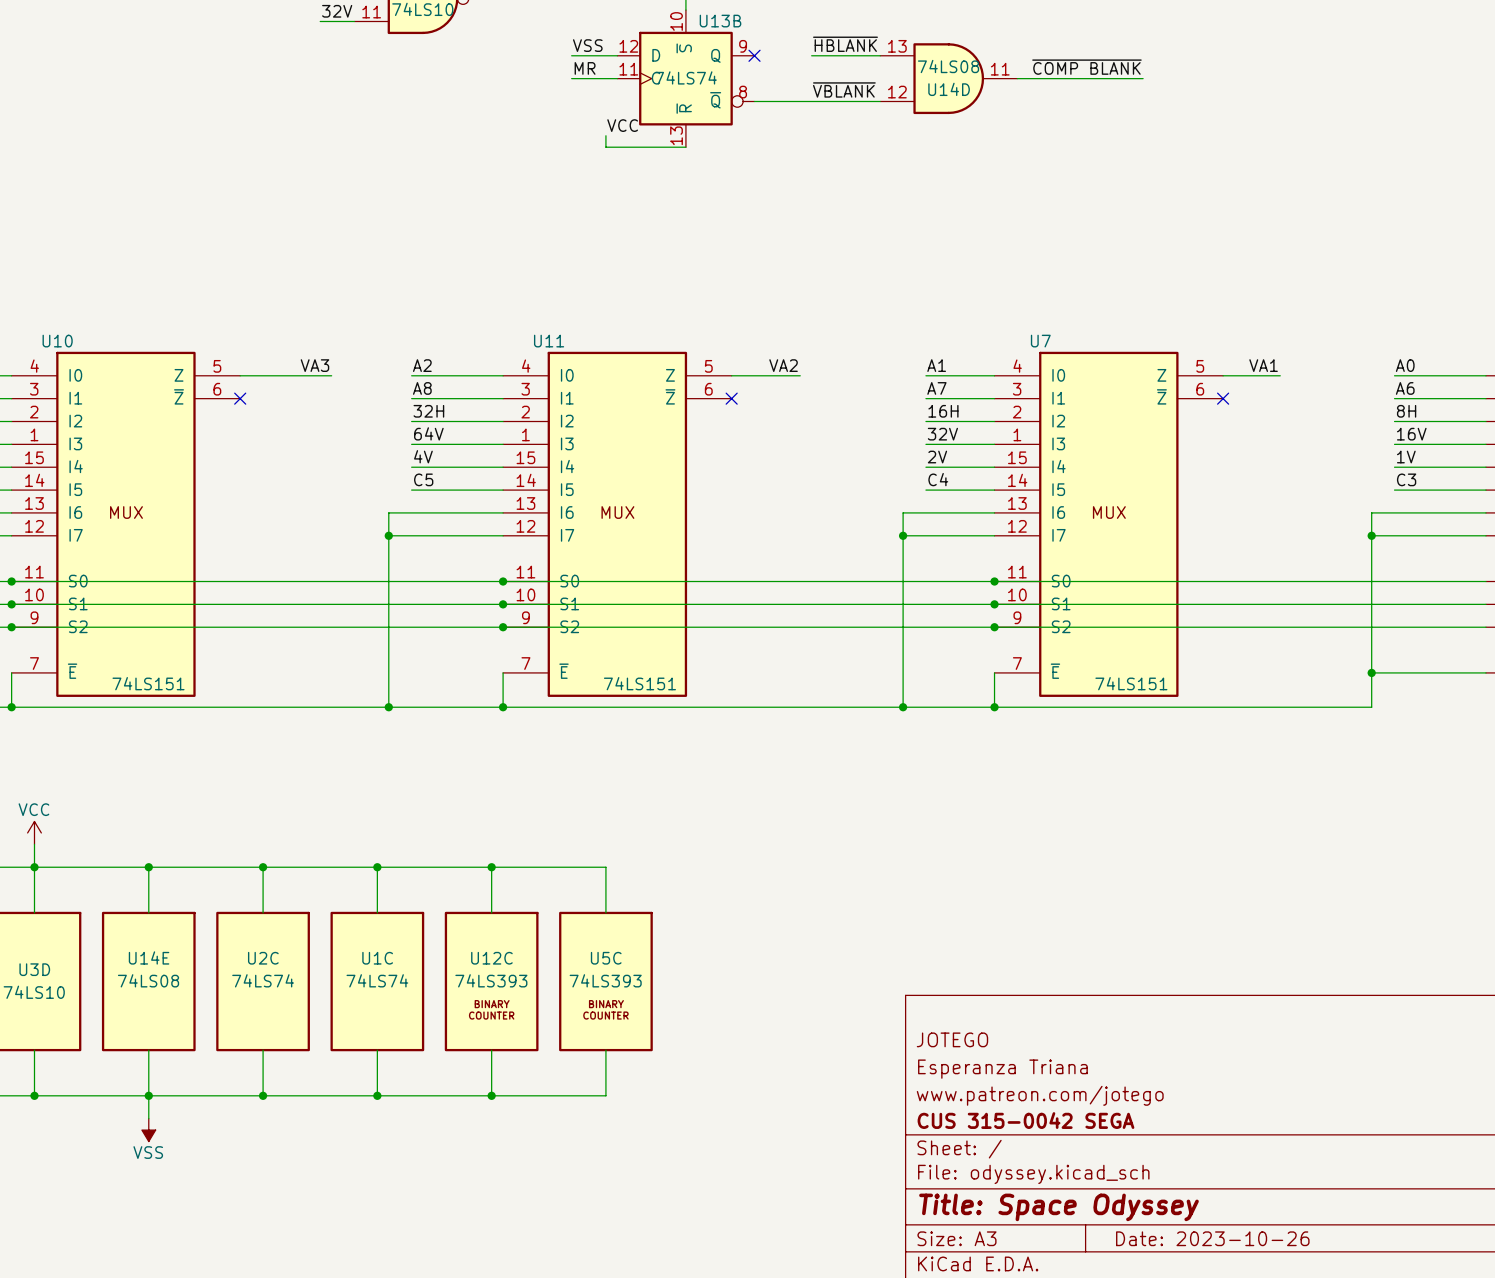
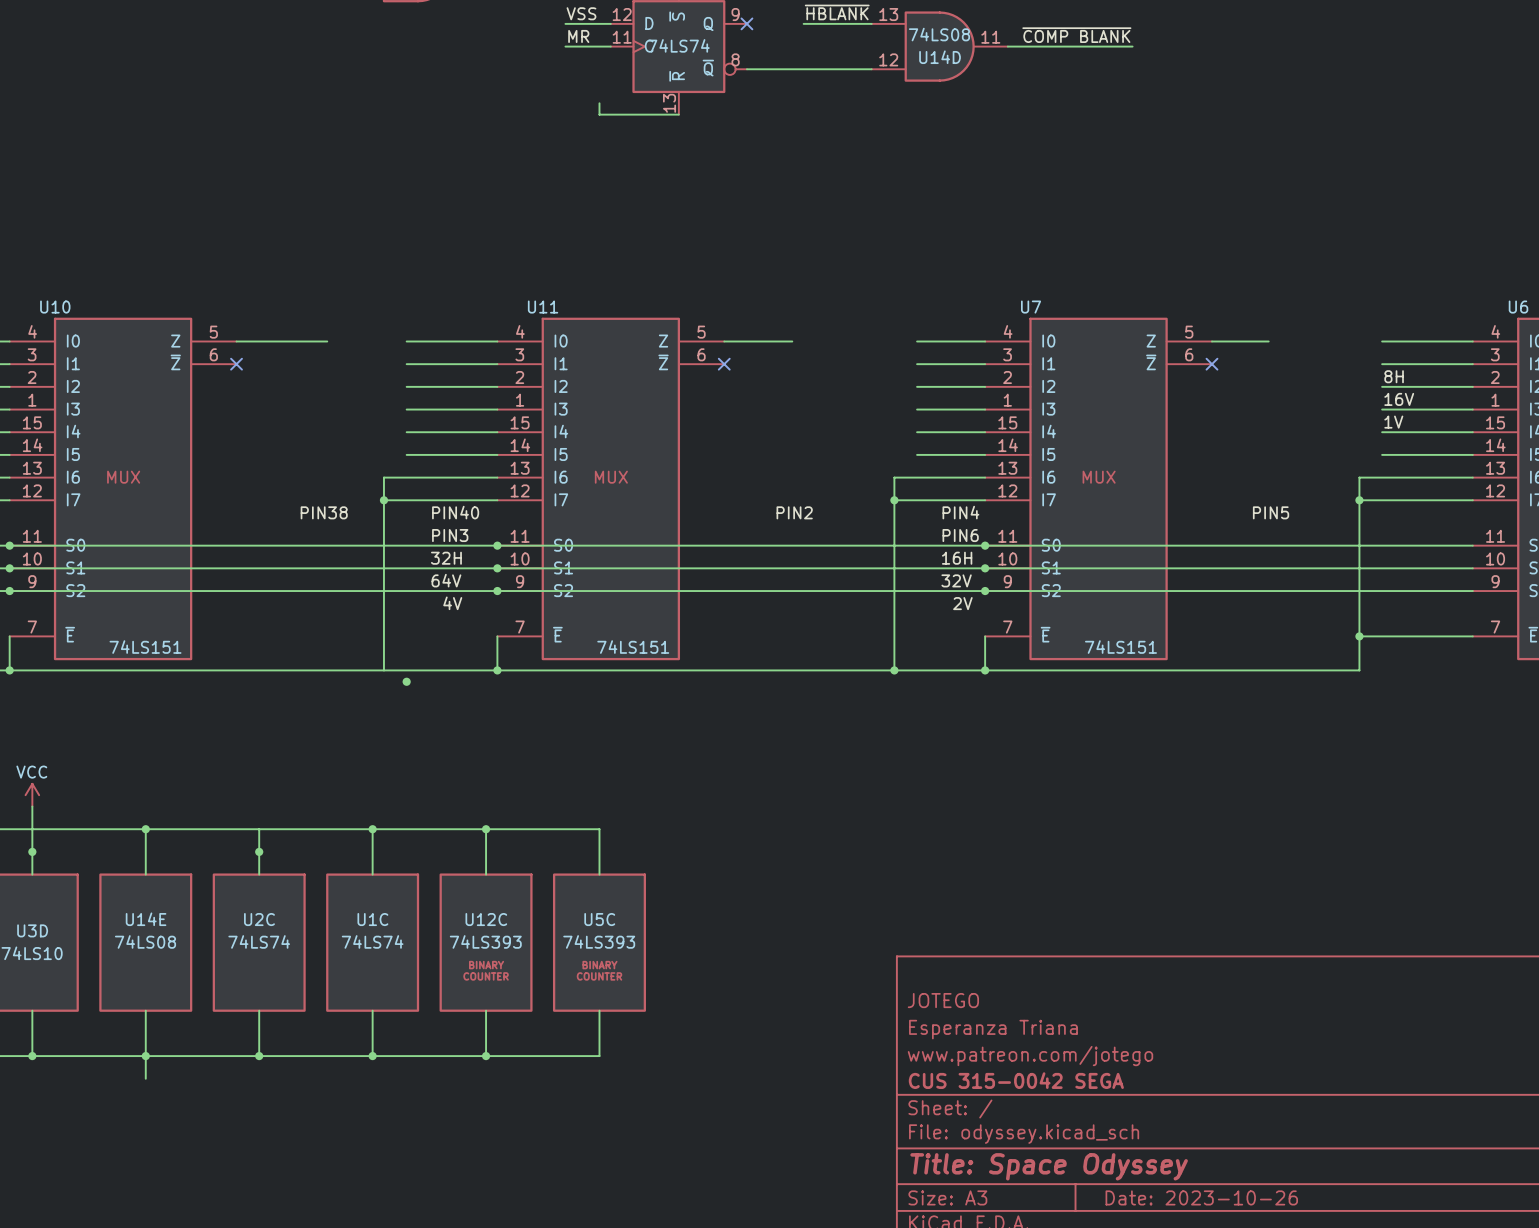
label: ~{VBLANK} (844, 89) -> none
label: VCC (622, 125) -> none
label: VA3 (314, 365) -> none
label: A2 (422, 365) -> none
label: VA2 (783, 365) -> none
label: A1 (936, 365) -> none
label: VA1 (1263, 365) -> none
label: A0 (1405, 365) -> none
label: A8 (422, 388) -> none
label: A7 (936, 388) -> none
label: A6 (1405, 388) -> none
label position: 32H (428, 411) -> 32H (446, 558)
label position: 16H (943, 411) -> 16H (957, 558)
label position: 64V (428, 433) -> 64V (446, 580)
label position: 32V (942, 434) -> 32V (956, 580)
label position: 4V (423, 456) -> 4V (452, 603)
label position: 2V (937, 457) -> 2V (962, 603)
label: C5 (423, 479) -> none
label: C4 (938, 479) -> none
label: C3 (1406, 479) -> none
label: none -> PIN38 (324, 512)
label: none -> PIN40 (455, 512)
label: none -> PIN2 (794, 512)
label: none -> PIN4 (960, 512)
label: none -> PIN5 (1271, 512)
label: none -> PIN3 (450, 535)
label: none -> PIN6 (960, 535)
junction position: (388, 707) -> (406, 681)
junction position: (34, 867) -> (32, 851)
junction position: (263, 867) -> (259, 851)
power symbol: VSS (148, 1130) -> none

